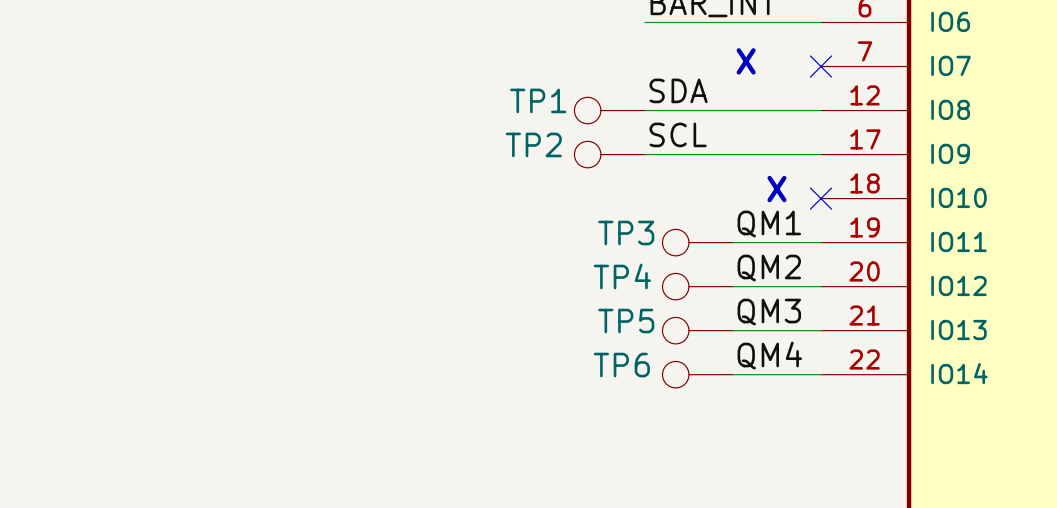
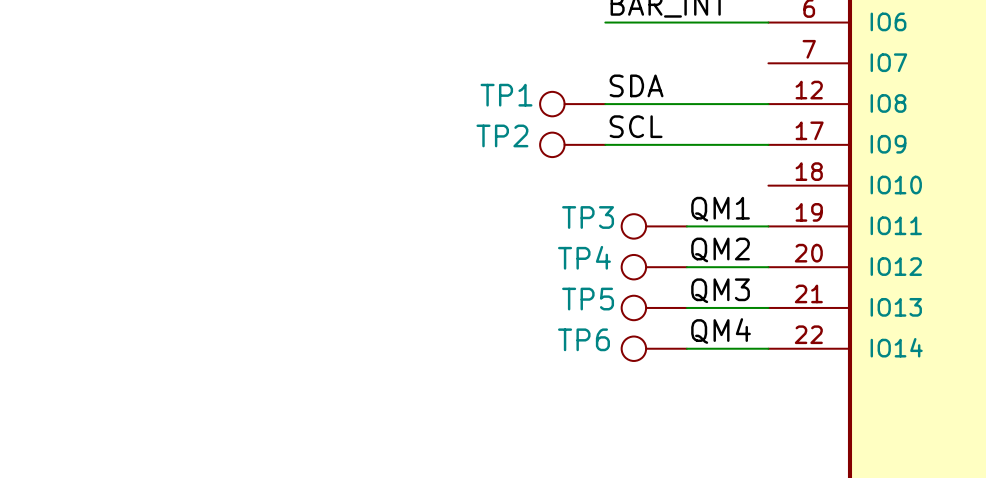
text: X (746, 61) -> none
no-connect mark: (820, 66) -> none
text: X (776, 189) -> none
no-connect mark: (820, 198) -> none

